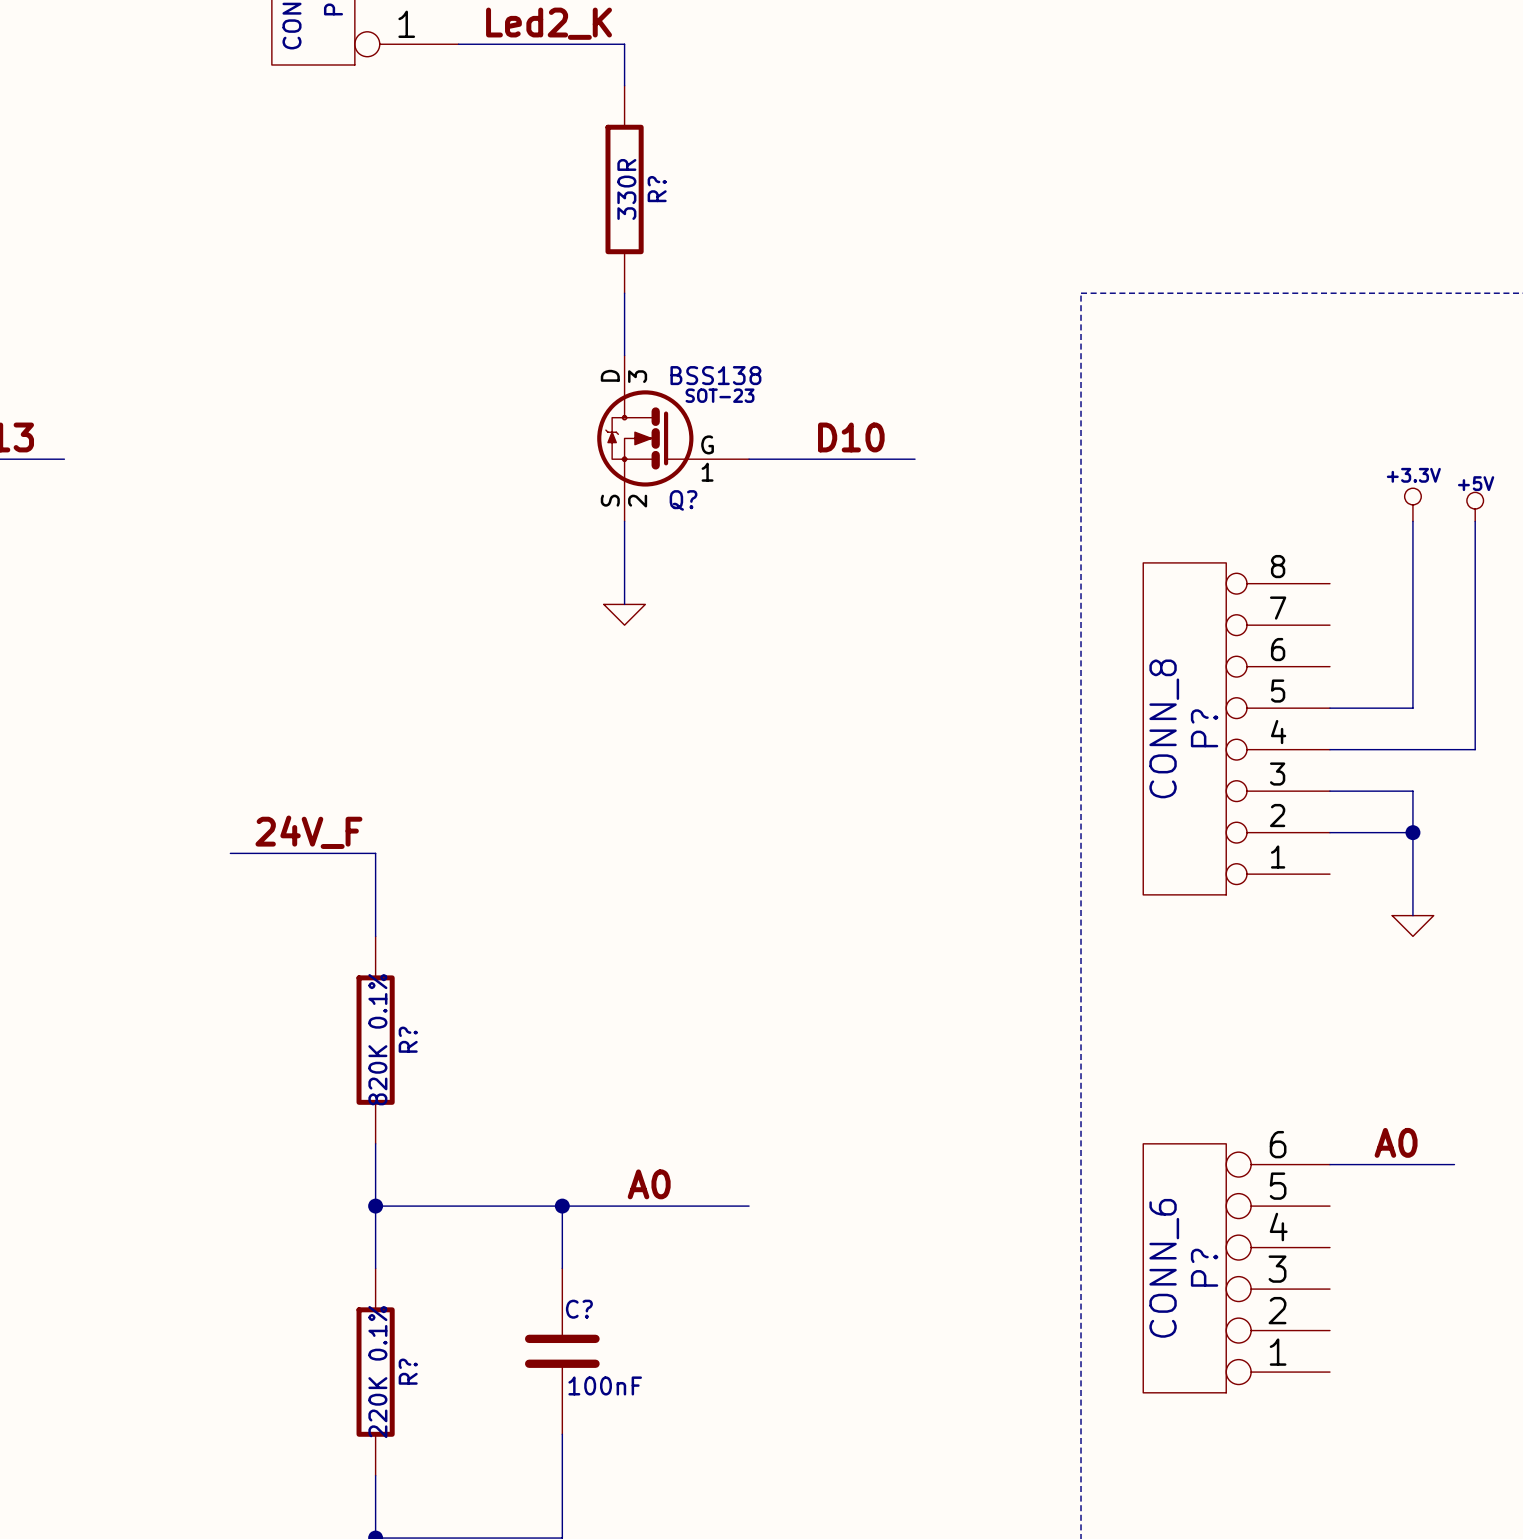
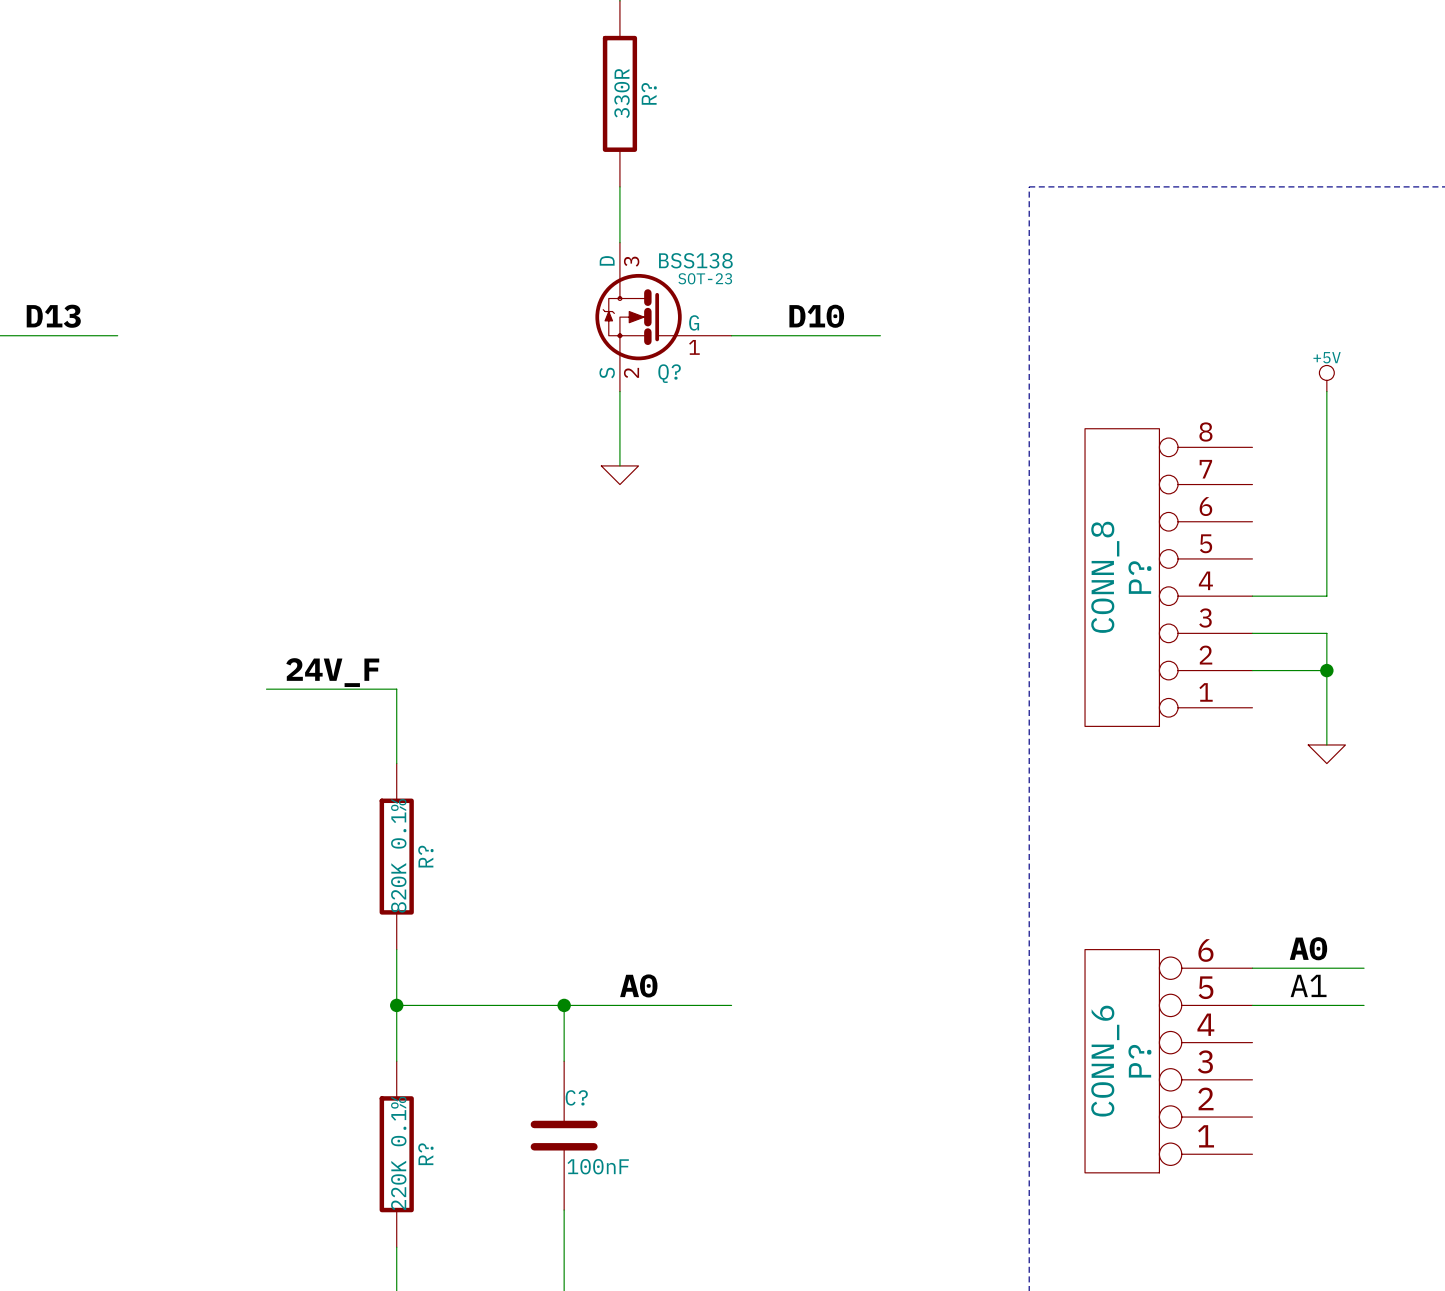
power symbol: +3.3V (1412, 504) -> +5V (1326, 378)
power symbol: +5V (1475, 506) -> none
wire: (1475, 521) (1475, 749) (1412, 749) -> none
wire: (1329, 708) (1412, 708) -> (1326, 596) (1326, 558)
label: none -> A1 (1308, 985)
wire: none -> (1252, 1005) (1364, 1005)

